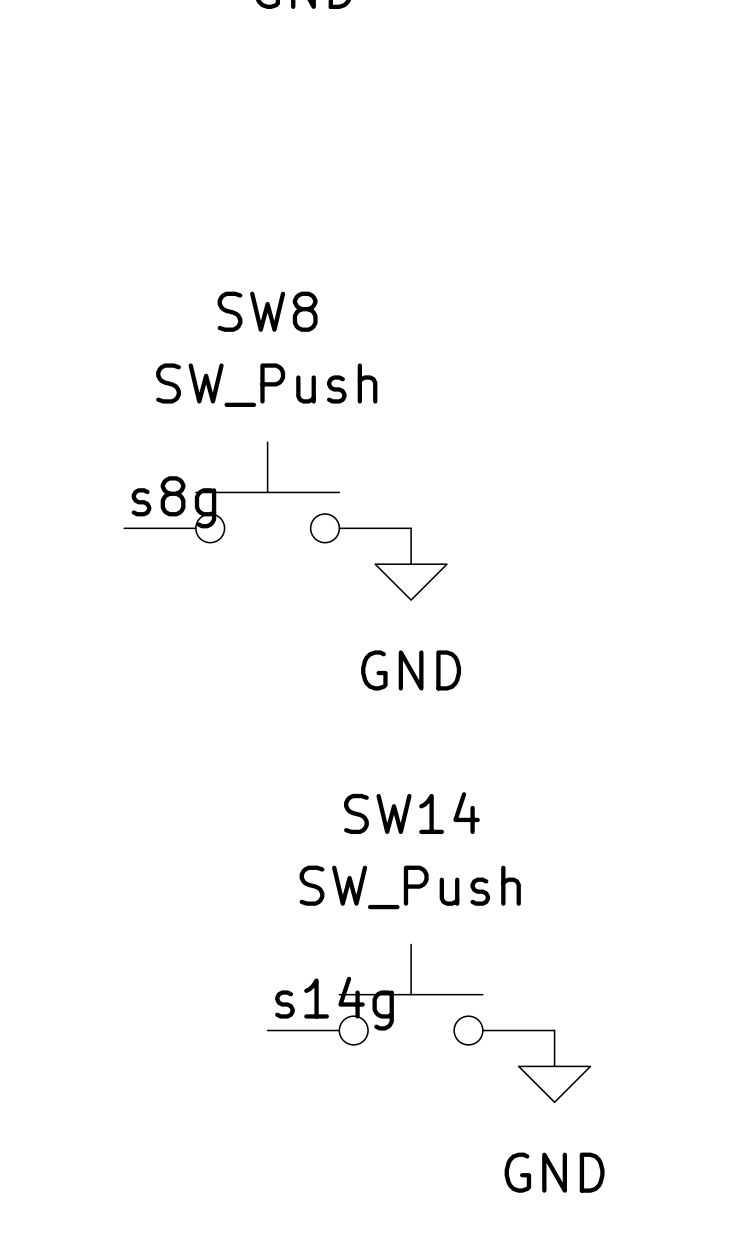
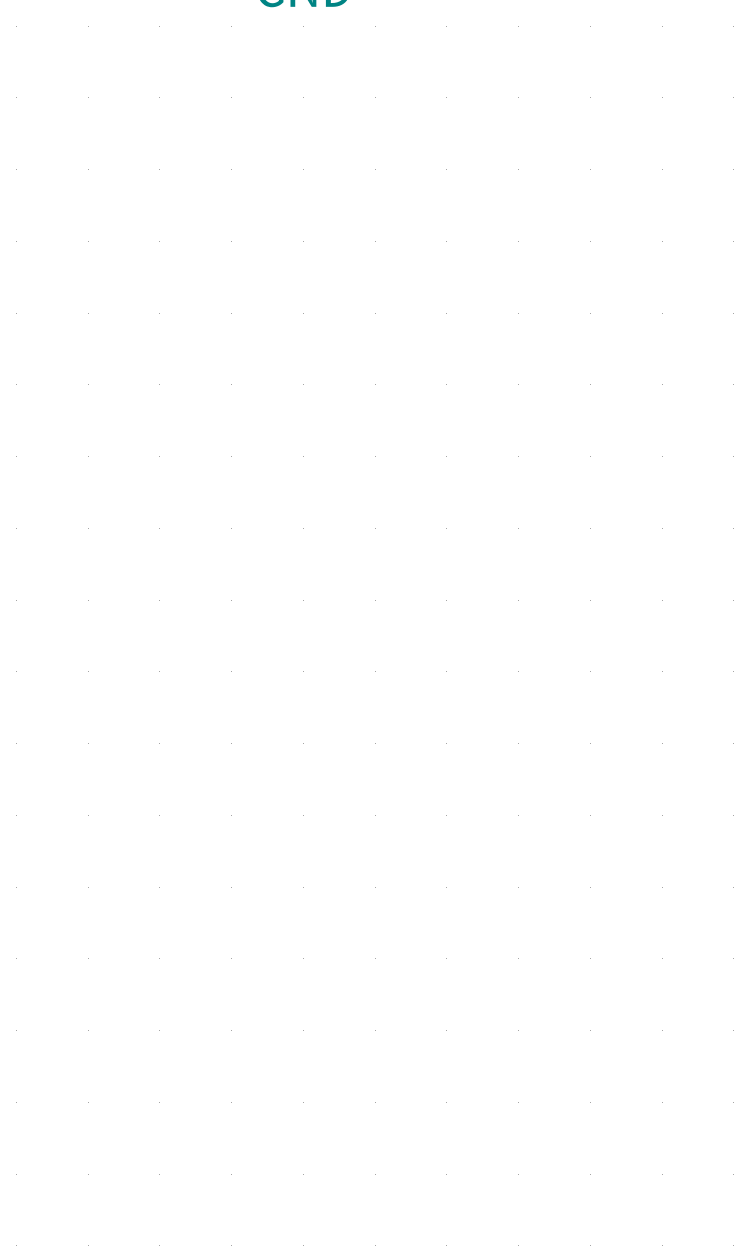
SW8: SW_Push (267, 492) -> none
label: s8g (173, 502) -> none
power symbol: GND (411, 564) -> none
SW14: SW_Push (411, 994) -> none
label: s14g (334, 1003) -> none
power symbol: GND (554, 1066) -> none

